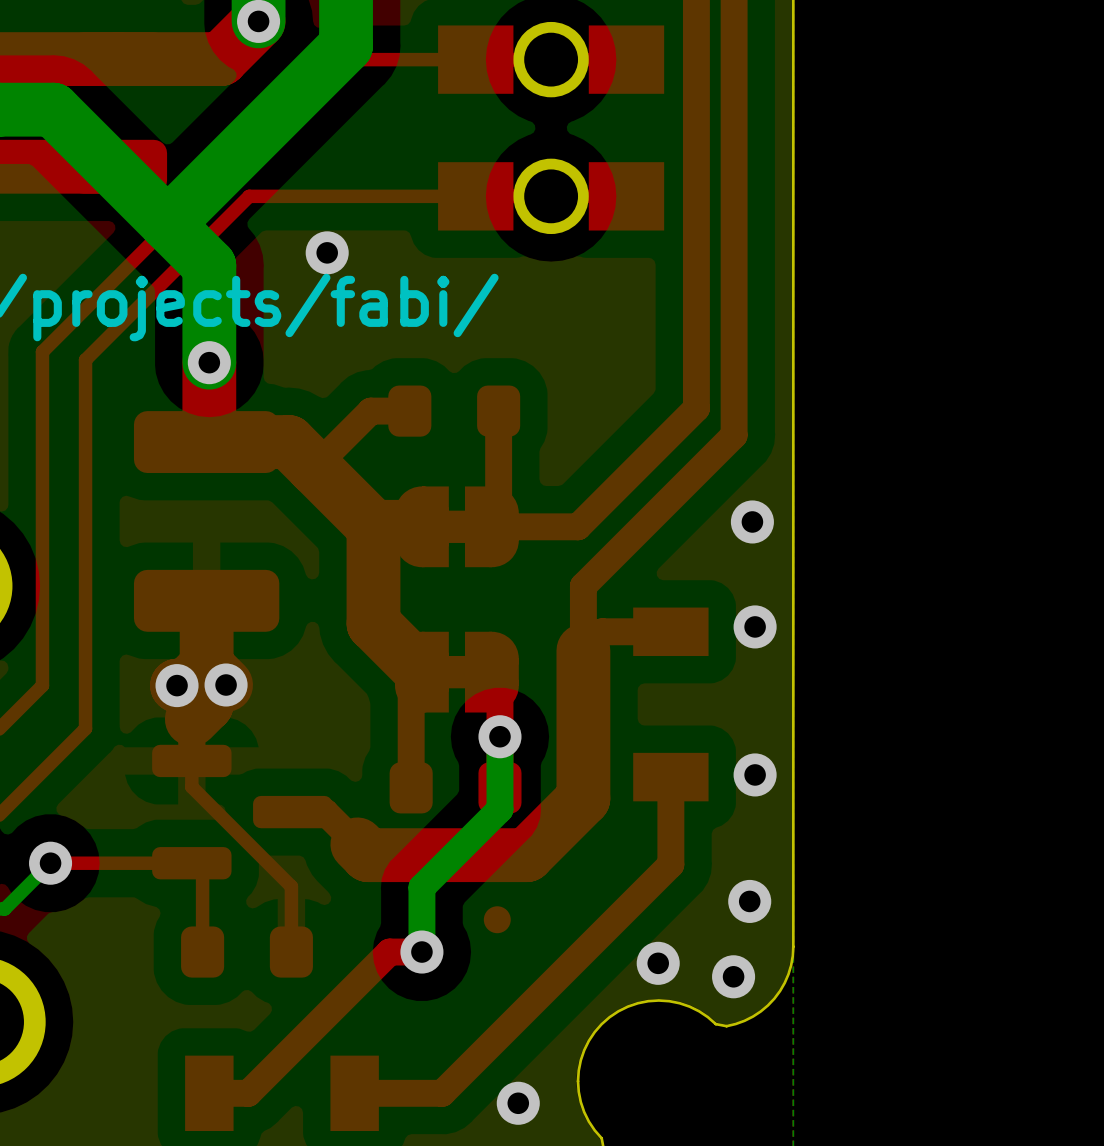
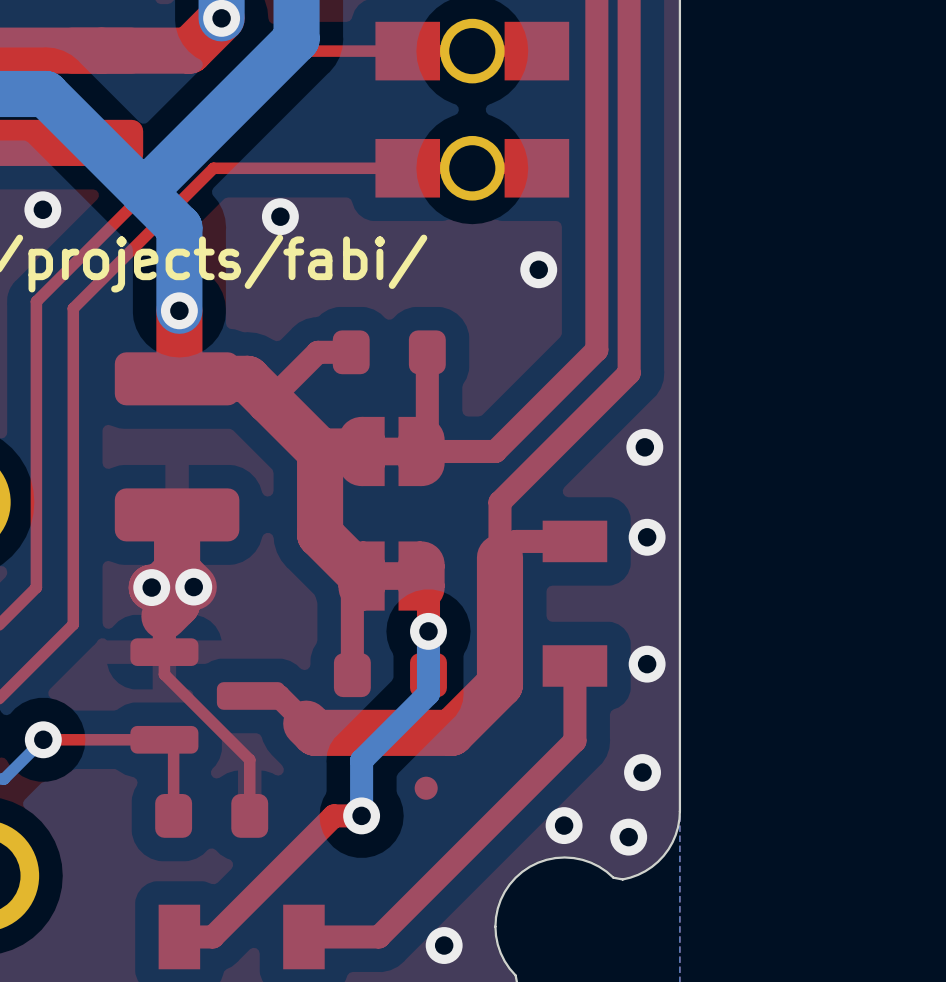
via: none -> (42, 209)
via: none -> (538, 269)

